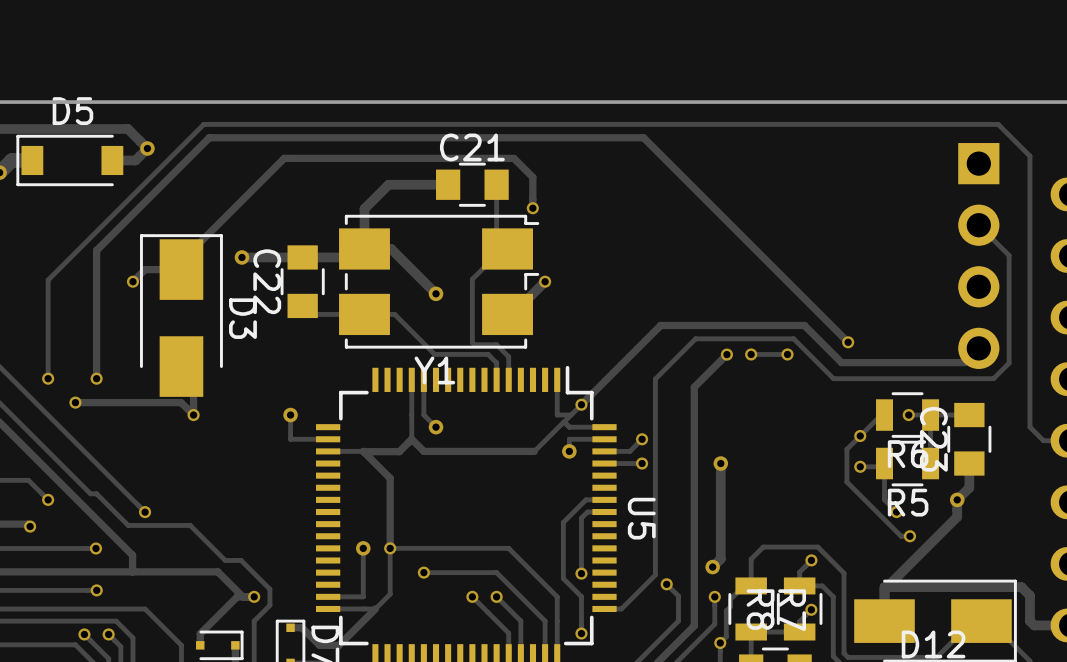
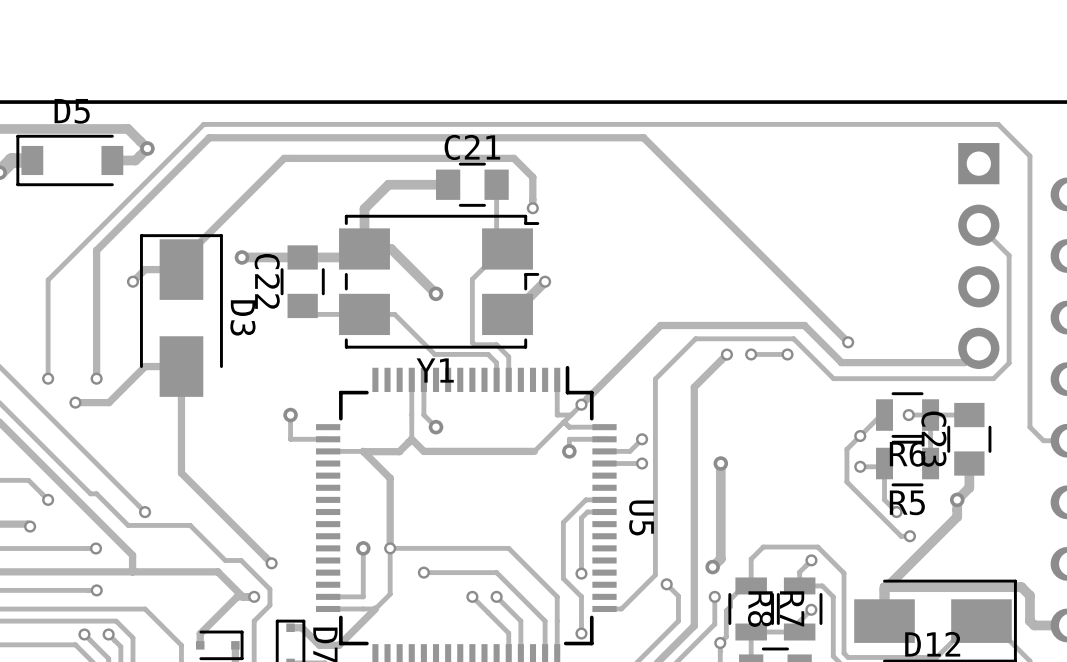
track: (181, 366) (193, 378) (193, 415) (181, 402) (109, 402) -> (271, 563) (181, 473) (181, 366) (145, 366) (109, 402)
via: (193, 415) -> none
via: none -> (271, 563)

